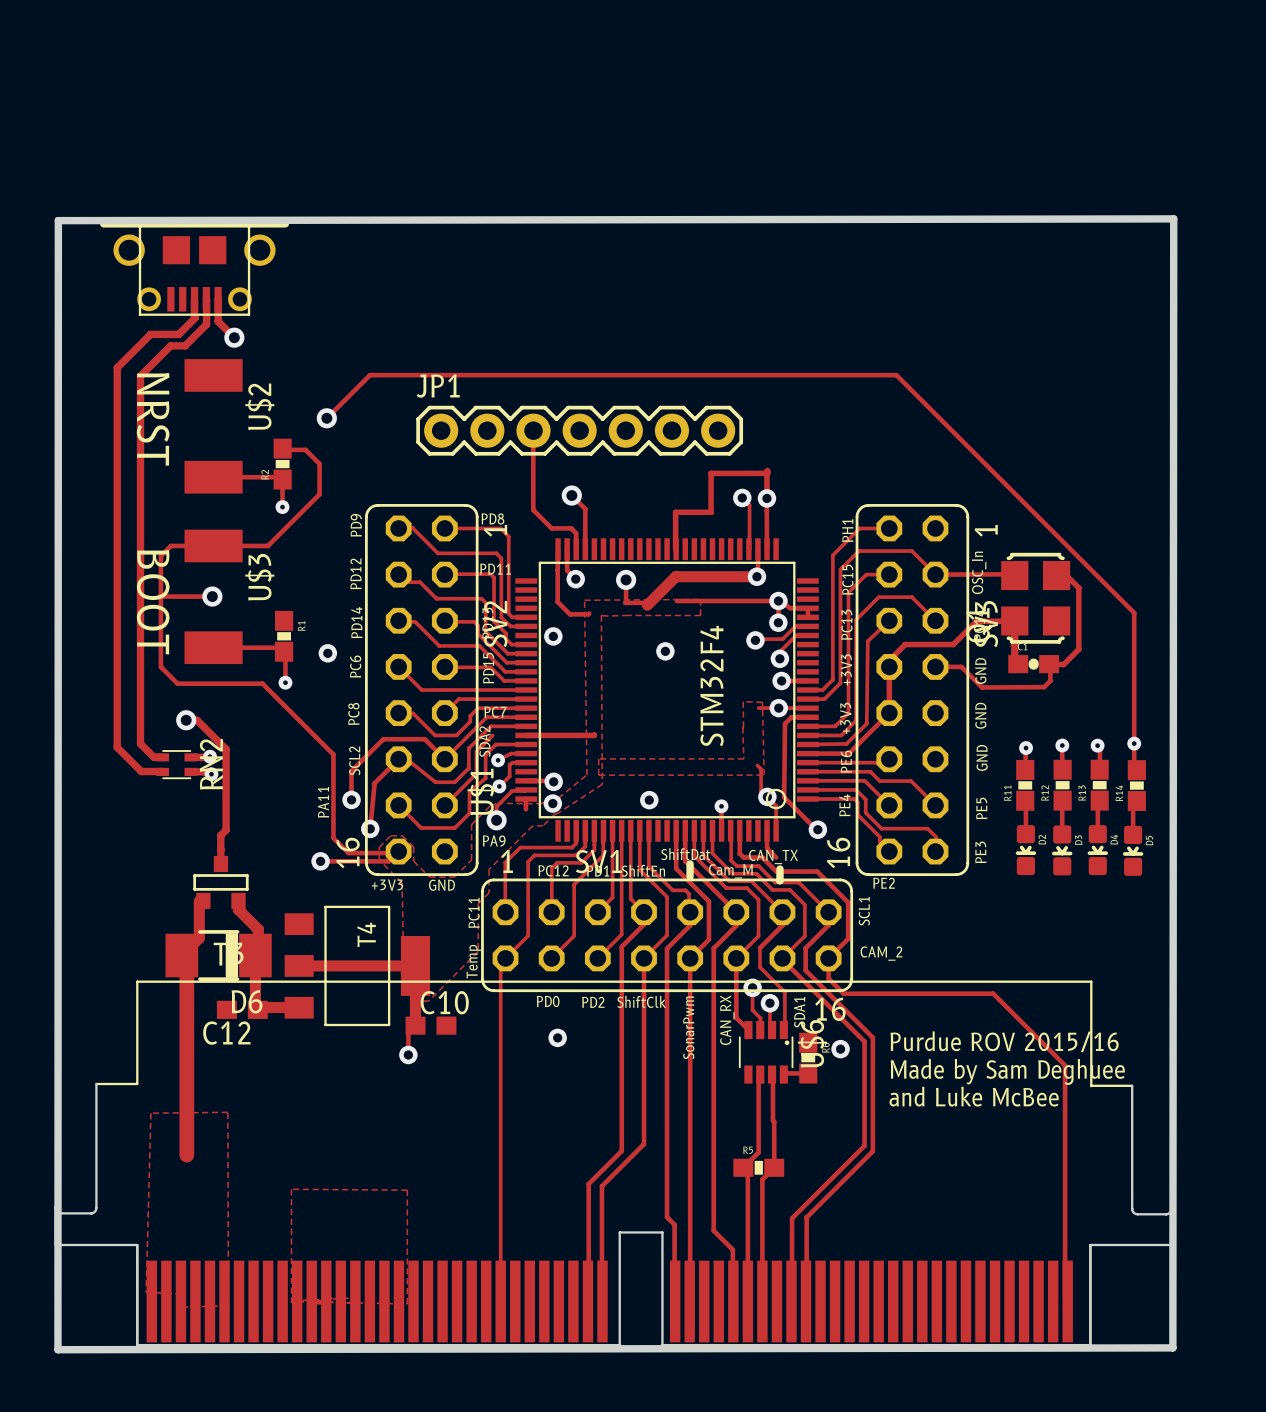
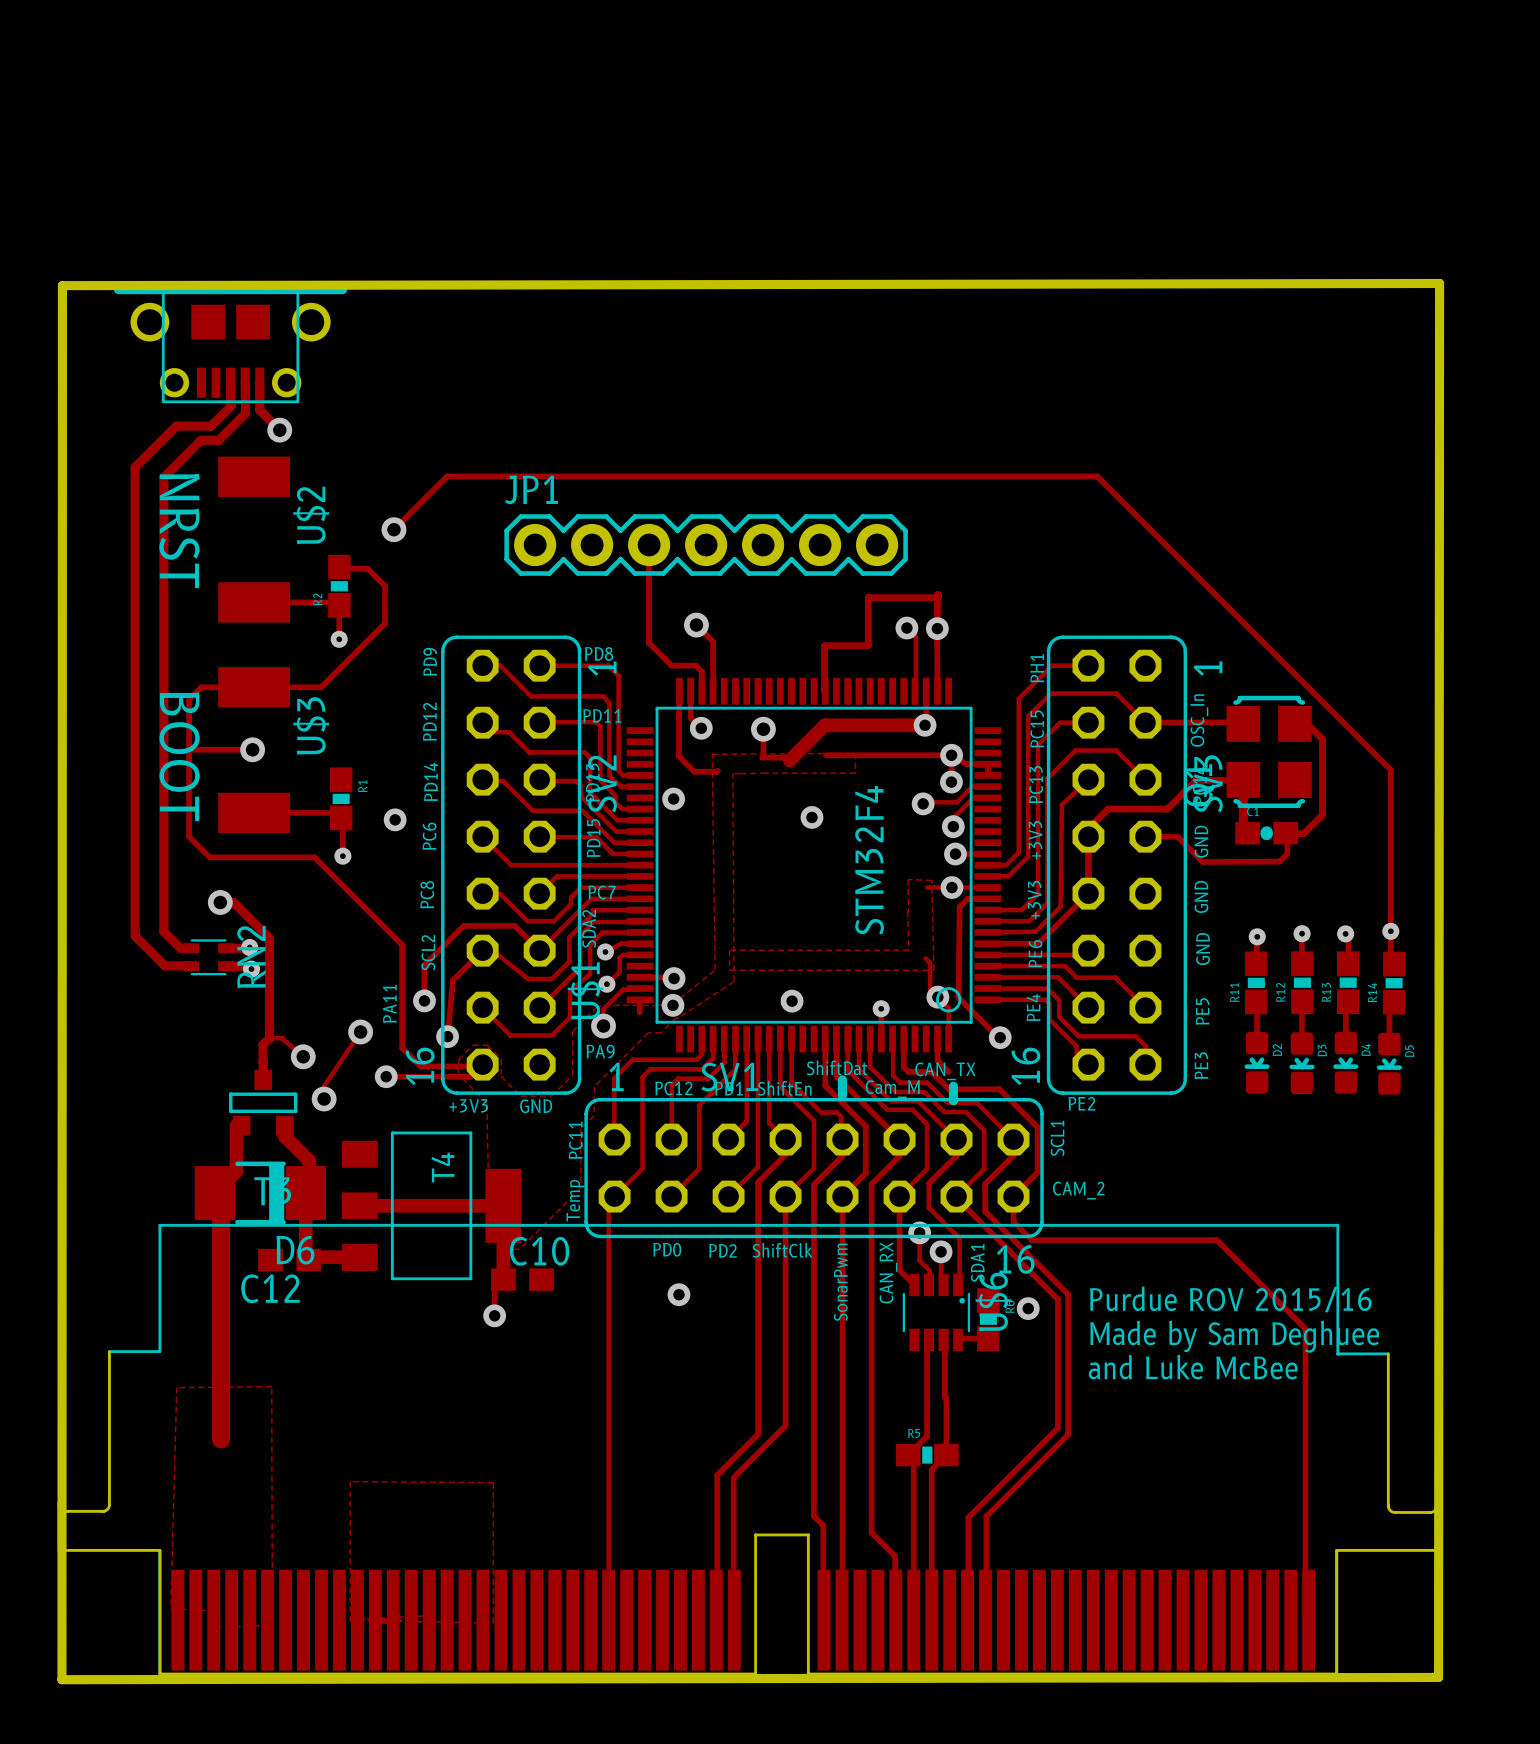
track: (594, 734) (526, 735) -> none
track: (492, 735) (476, 751) (476, 773) (444, 805) -> (640, 922) (593, 922) (580, 935) (580, 967) (539, 1007)
track: none -> (360, 1032) (324, 1086) (324, 1099)
via: none -> (360, 1032)
track: none -> (269, 1038) (282, 1038) (303, 1056)
via: none -> (303, 1056)
via: none -> (324, 1099)

